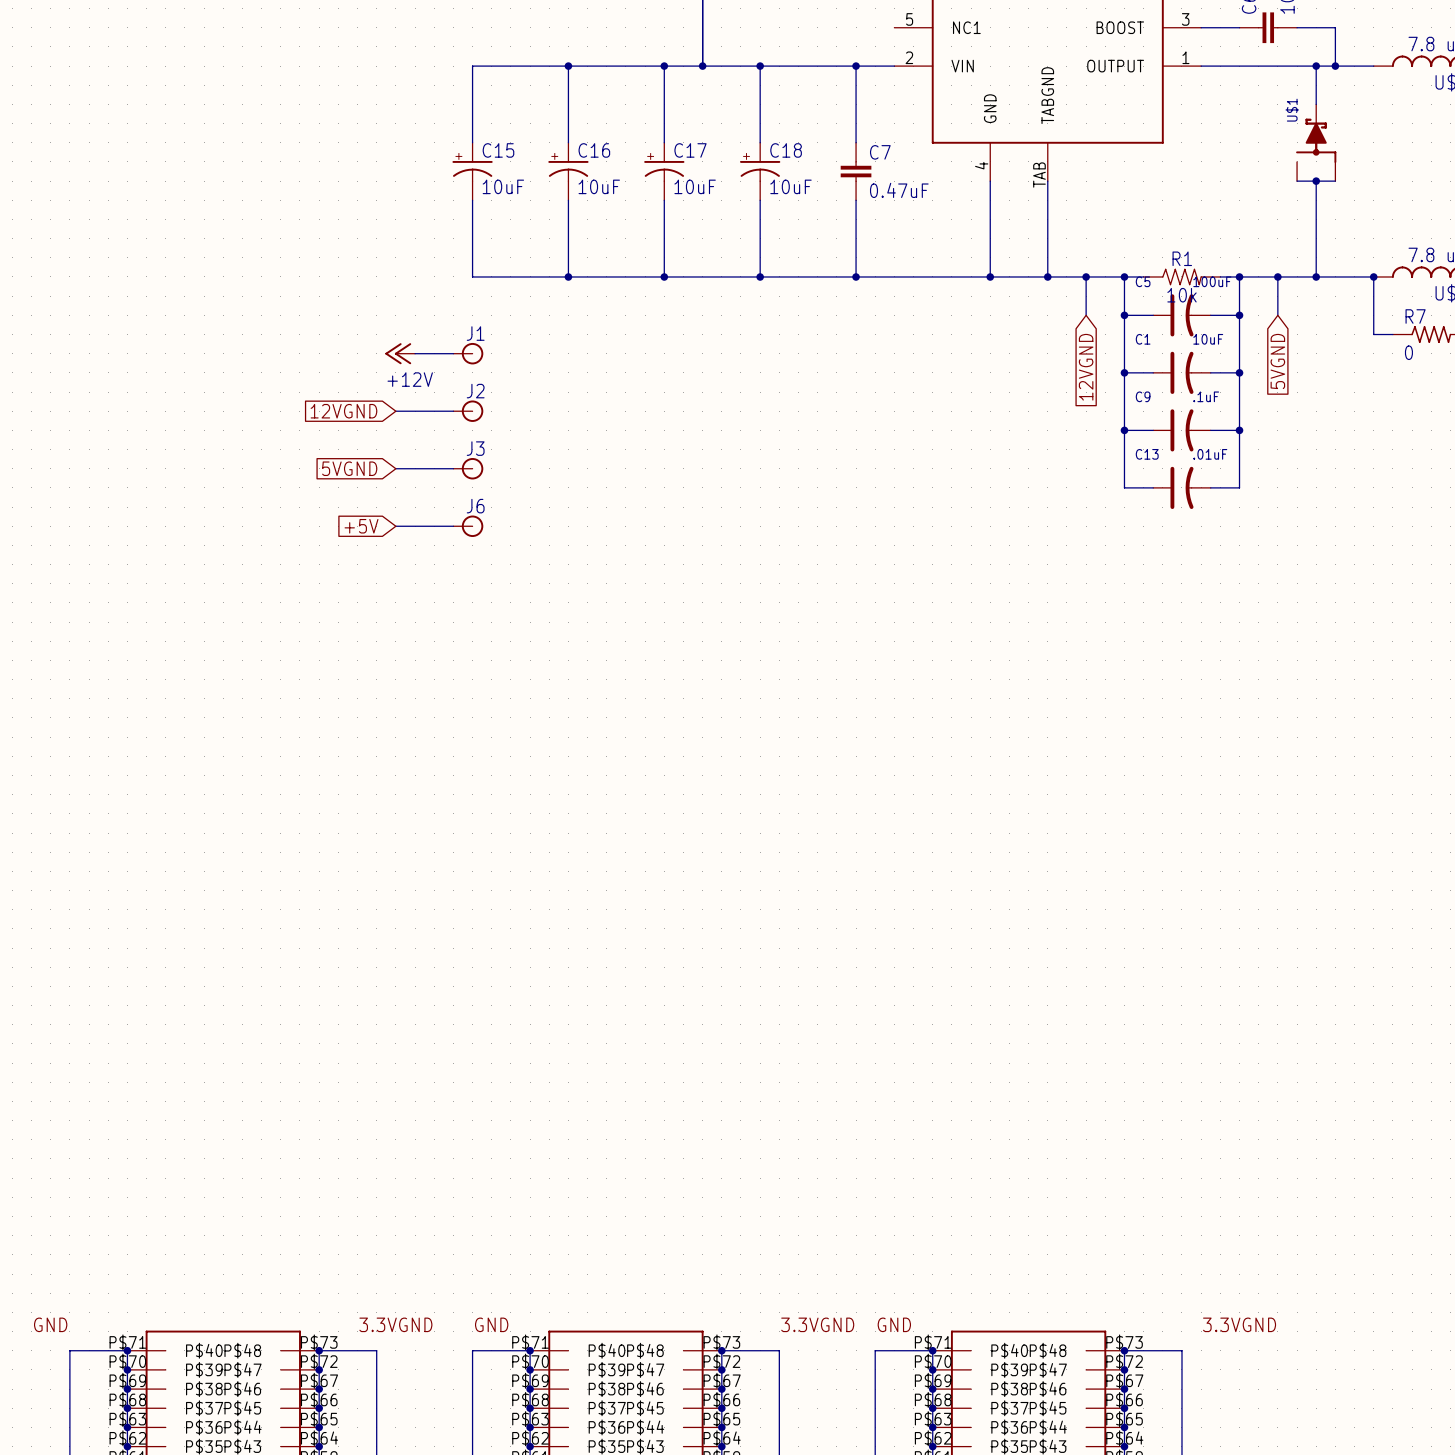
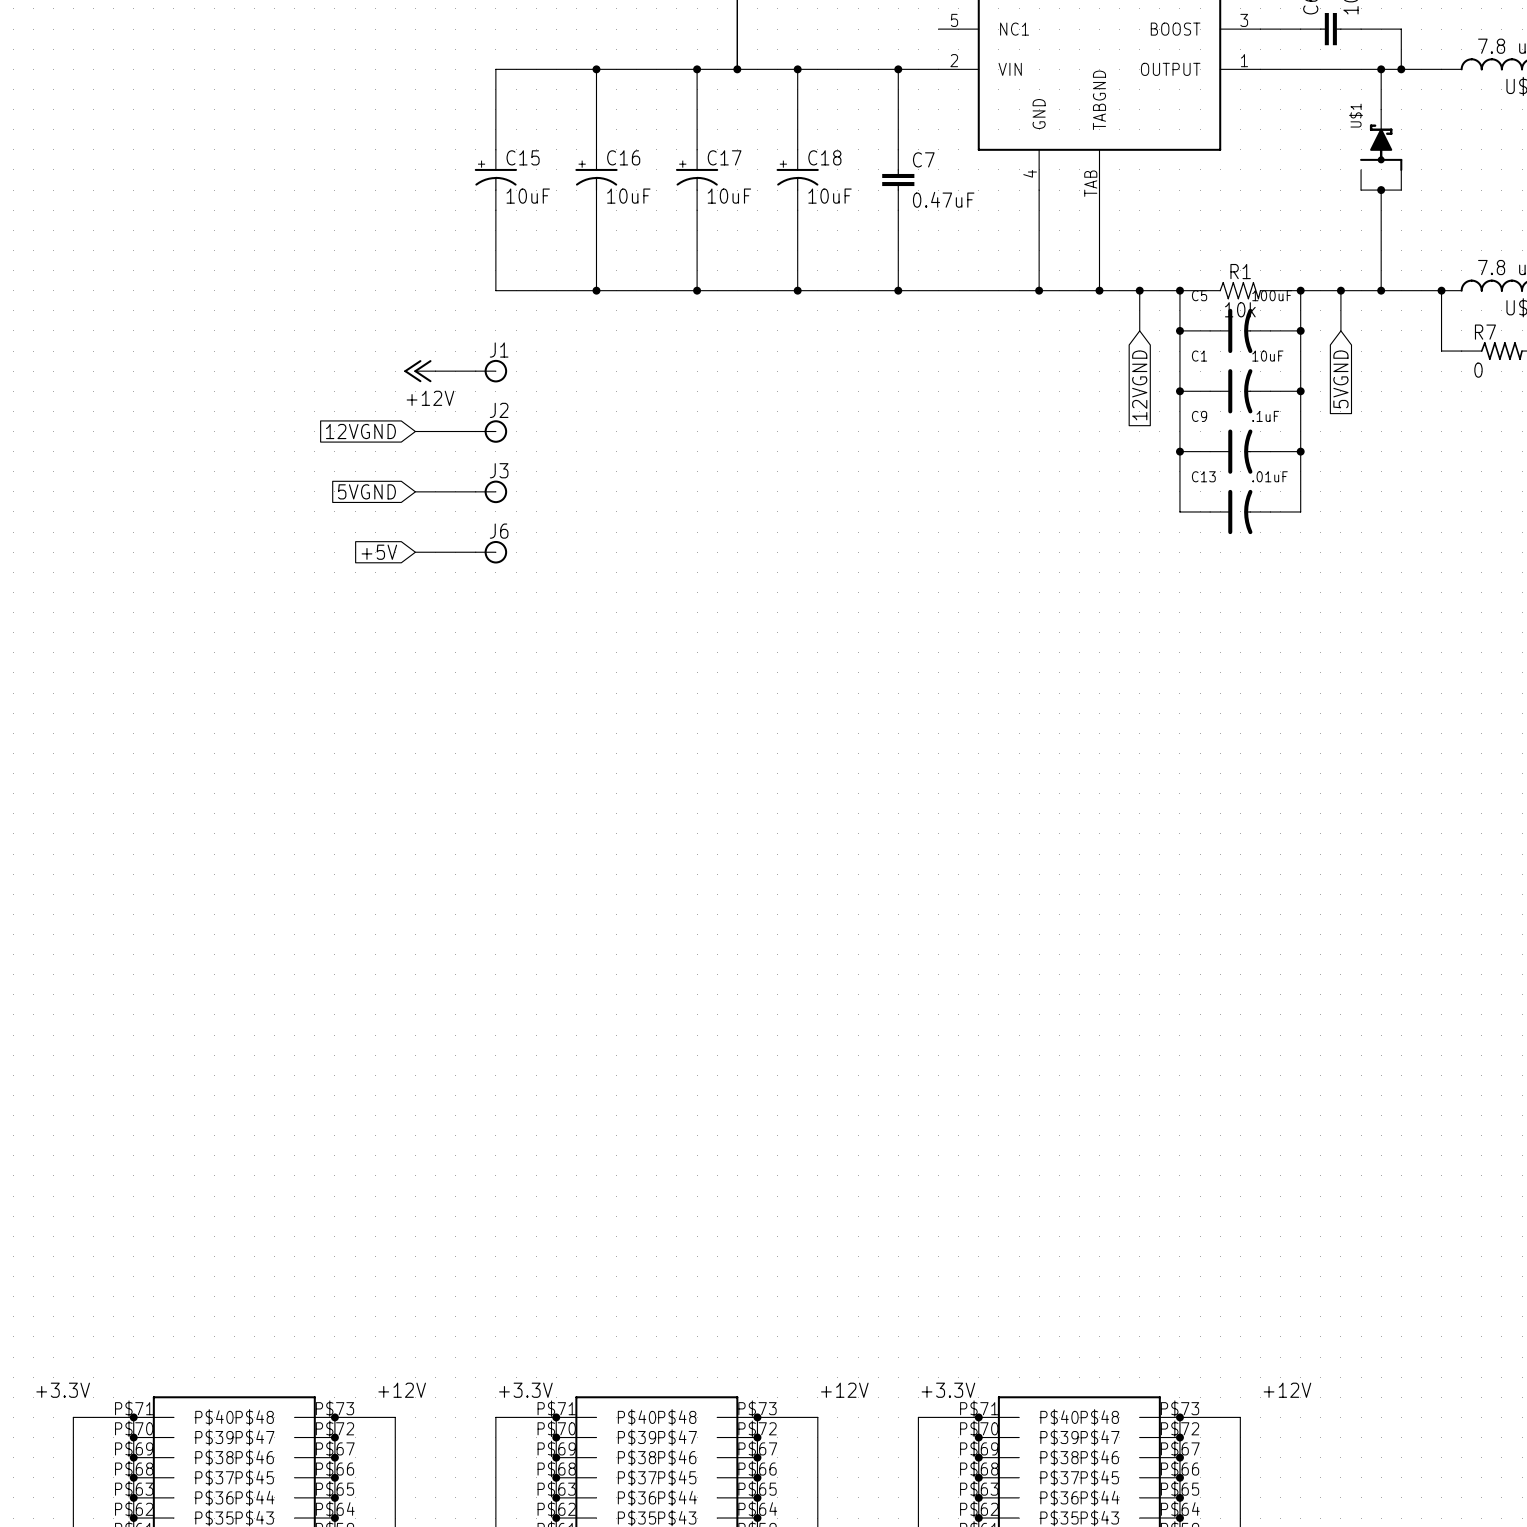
label: GND (50, 1324) -> +3.3V (63, 1390)
label: 3.3VGND (395, 1324) -> +12V (402, 1390)
label: GND (491, 1324) -> +3.3V (525, 1390)
label: 3.3VGND (817, 1324) -> +12V (844, 1390)
label: GND (894, 1324) -> +3.3V (948, 1390)
label: 3.3VGND (1239, 1324) -> +12V (1287, 1390)

